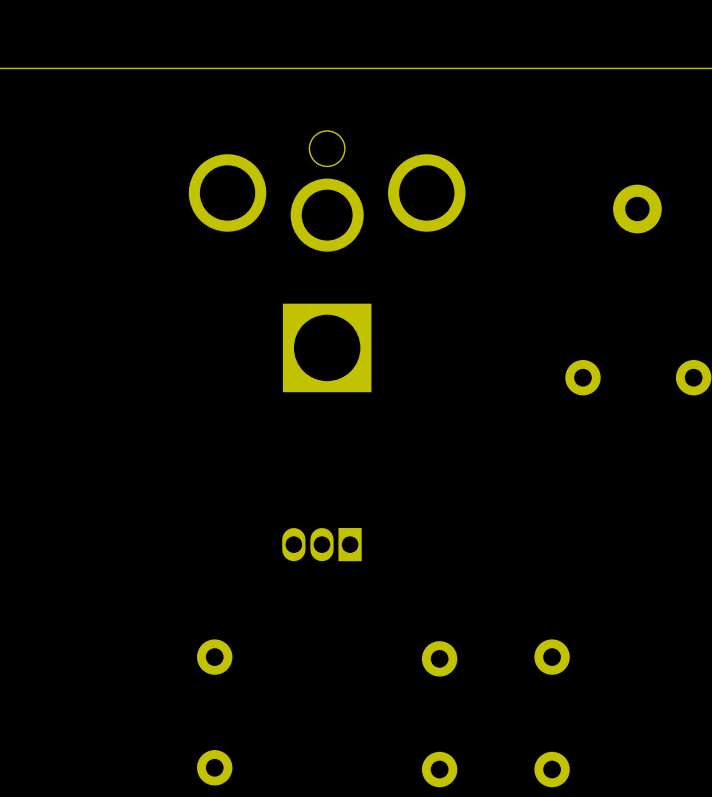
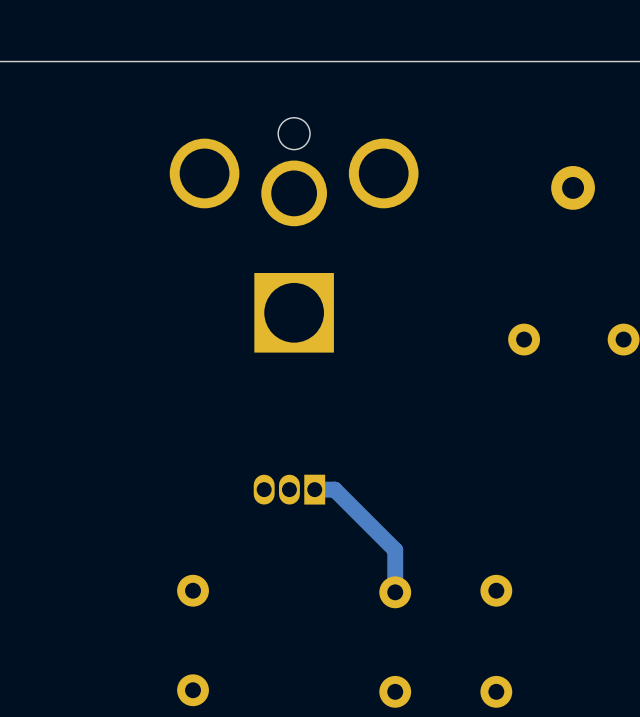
track: none -> (314, 489) (334, 489) (395, 550) (395, 592)

